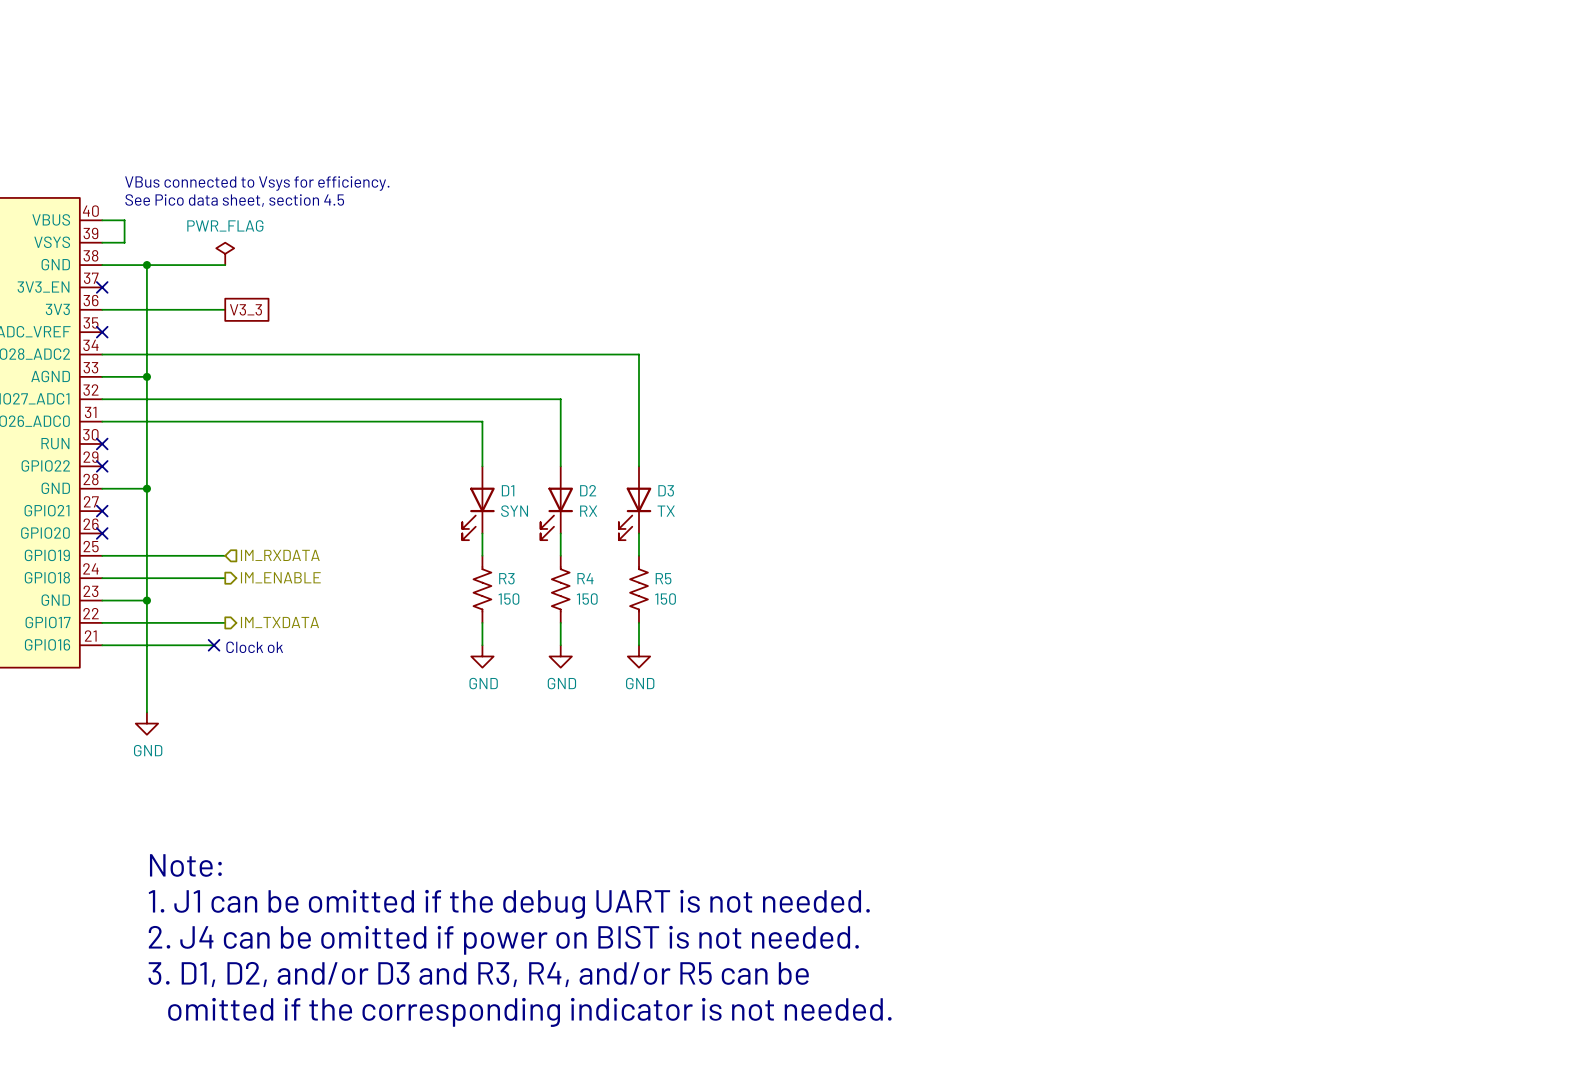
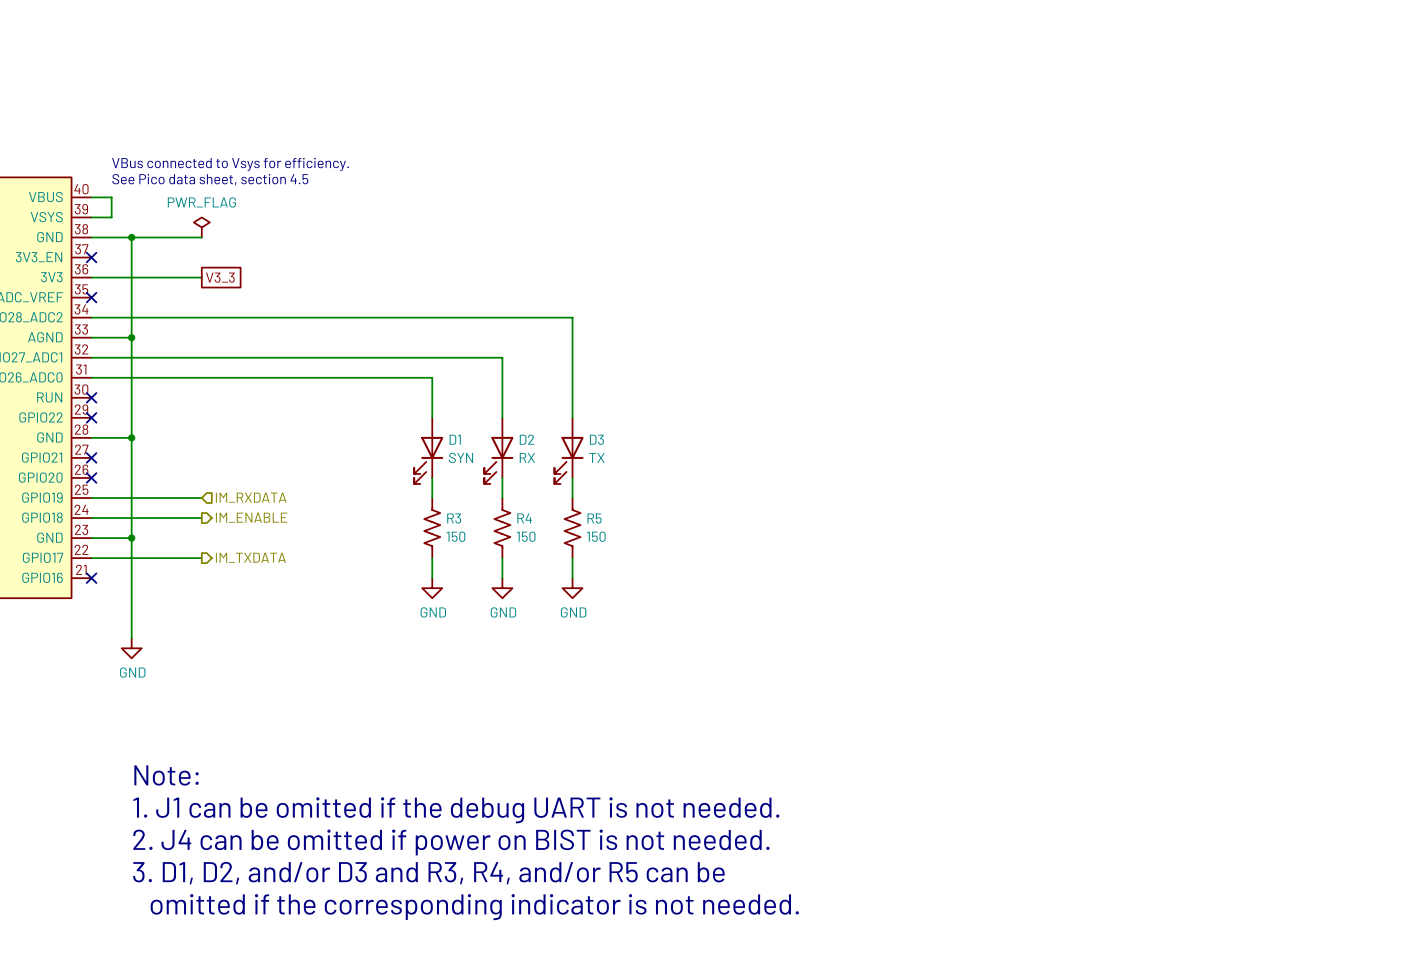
wire: (102, 645) (214, 645) -> none
no-connect mark: none -> (91, 578)
no-connect mark: (214, 645) -> none
text: Clock ok (254, 647) -> none

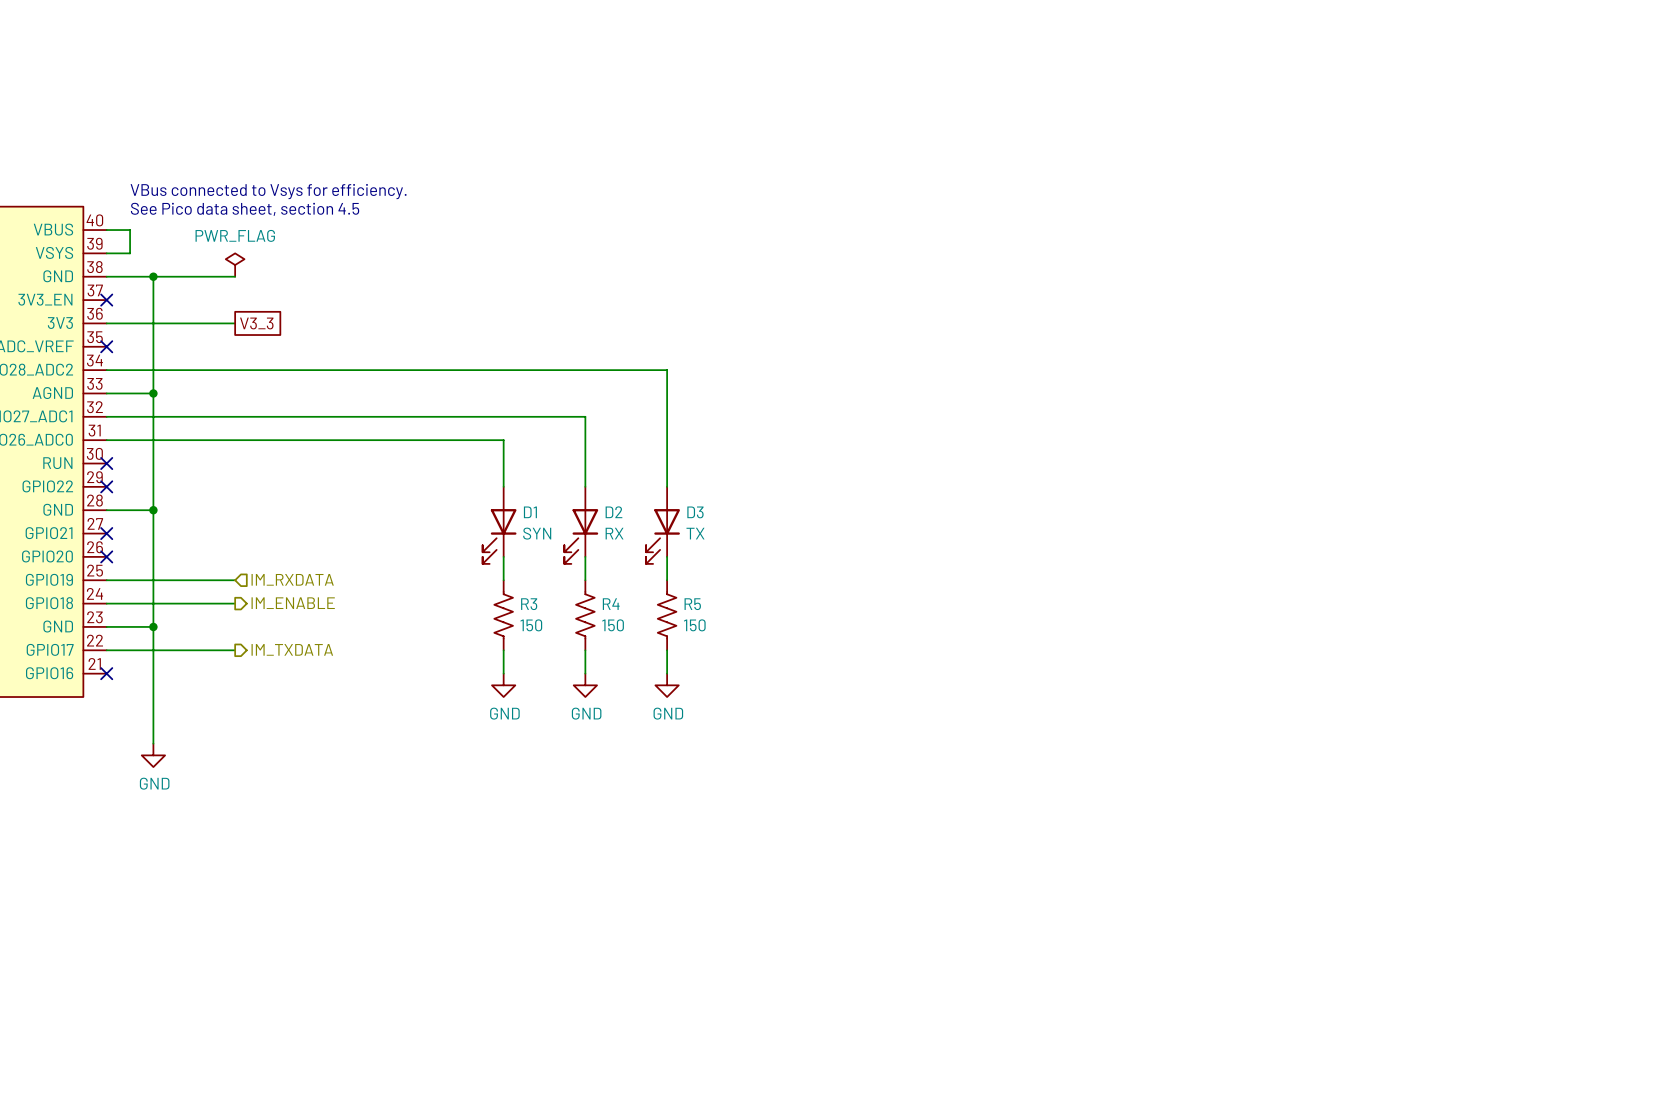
text: Note: (166, 775) -> none
text: 1. J1 can be omitted if the debug UART is not needed. (456, 810) -> none
text: 2. J4 can be omitted if power on BIST is not needed. (451, 842) -> none
text: 3. D1, D2, and/or D3 and R3, R4, and/or R5 can be (428, 873) -> none
text: omitted if the corresponding indicator is not needed. (474, 907) -> none

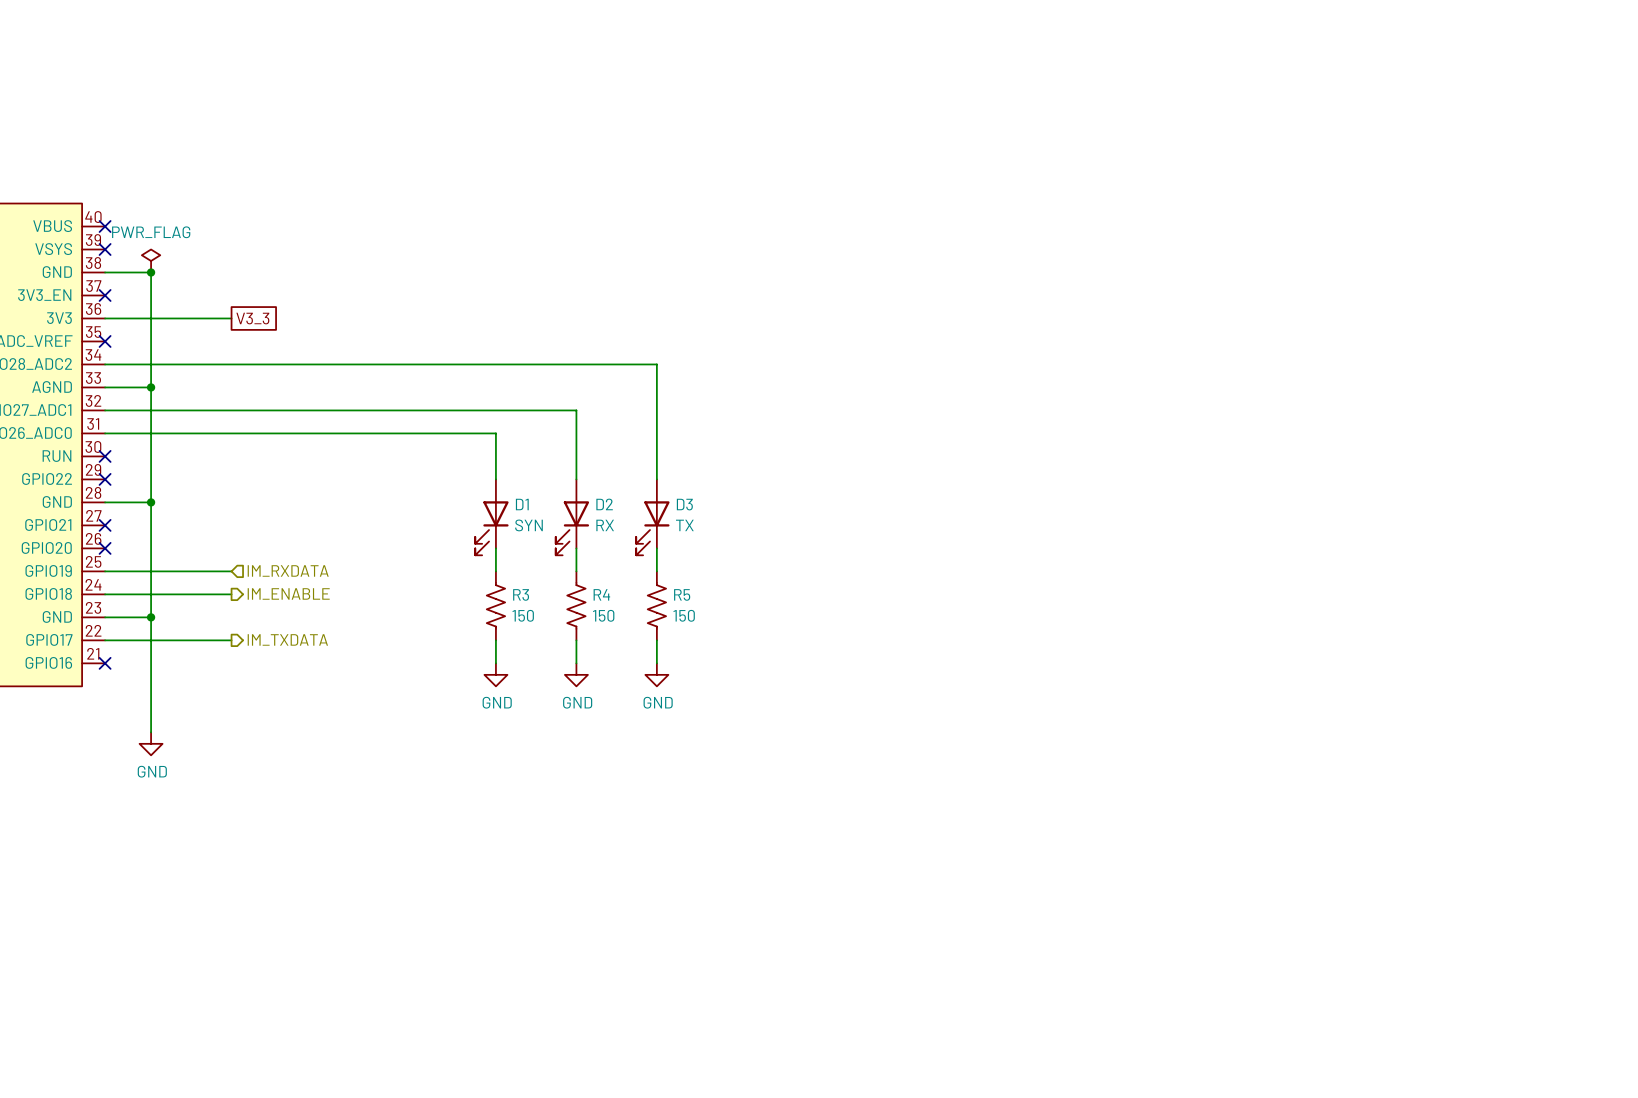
text: VBus connected to Vsys for efficiency. (268, 191) -> none
text: See Pico data sheet, section 4.5 (245, 209) -> none
wire: (106, 230) (130, 230) (130, 253) (106, 253) -> none
no-connect mark: none -> (105, 226)
no-connect mark: none -> (105, 249)
power symbol position: PWR_FLAG (235, 265) -> PWR_FLAG (151, 260)
wire: (153, 276) (235, 276) -> none

